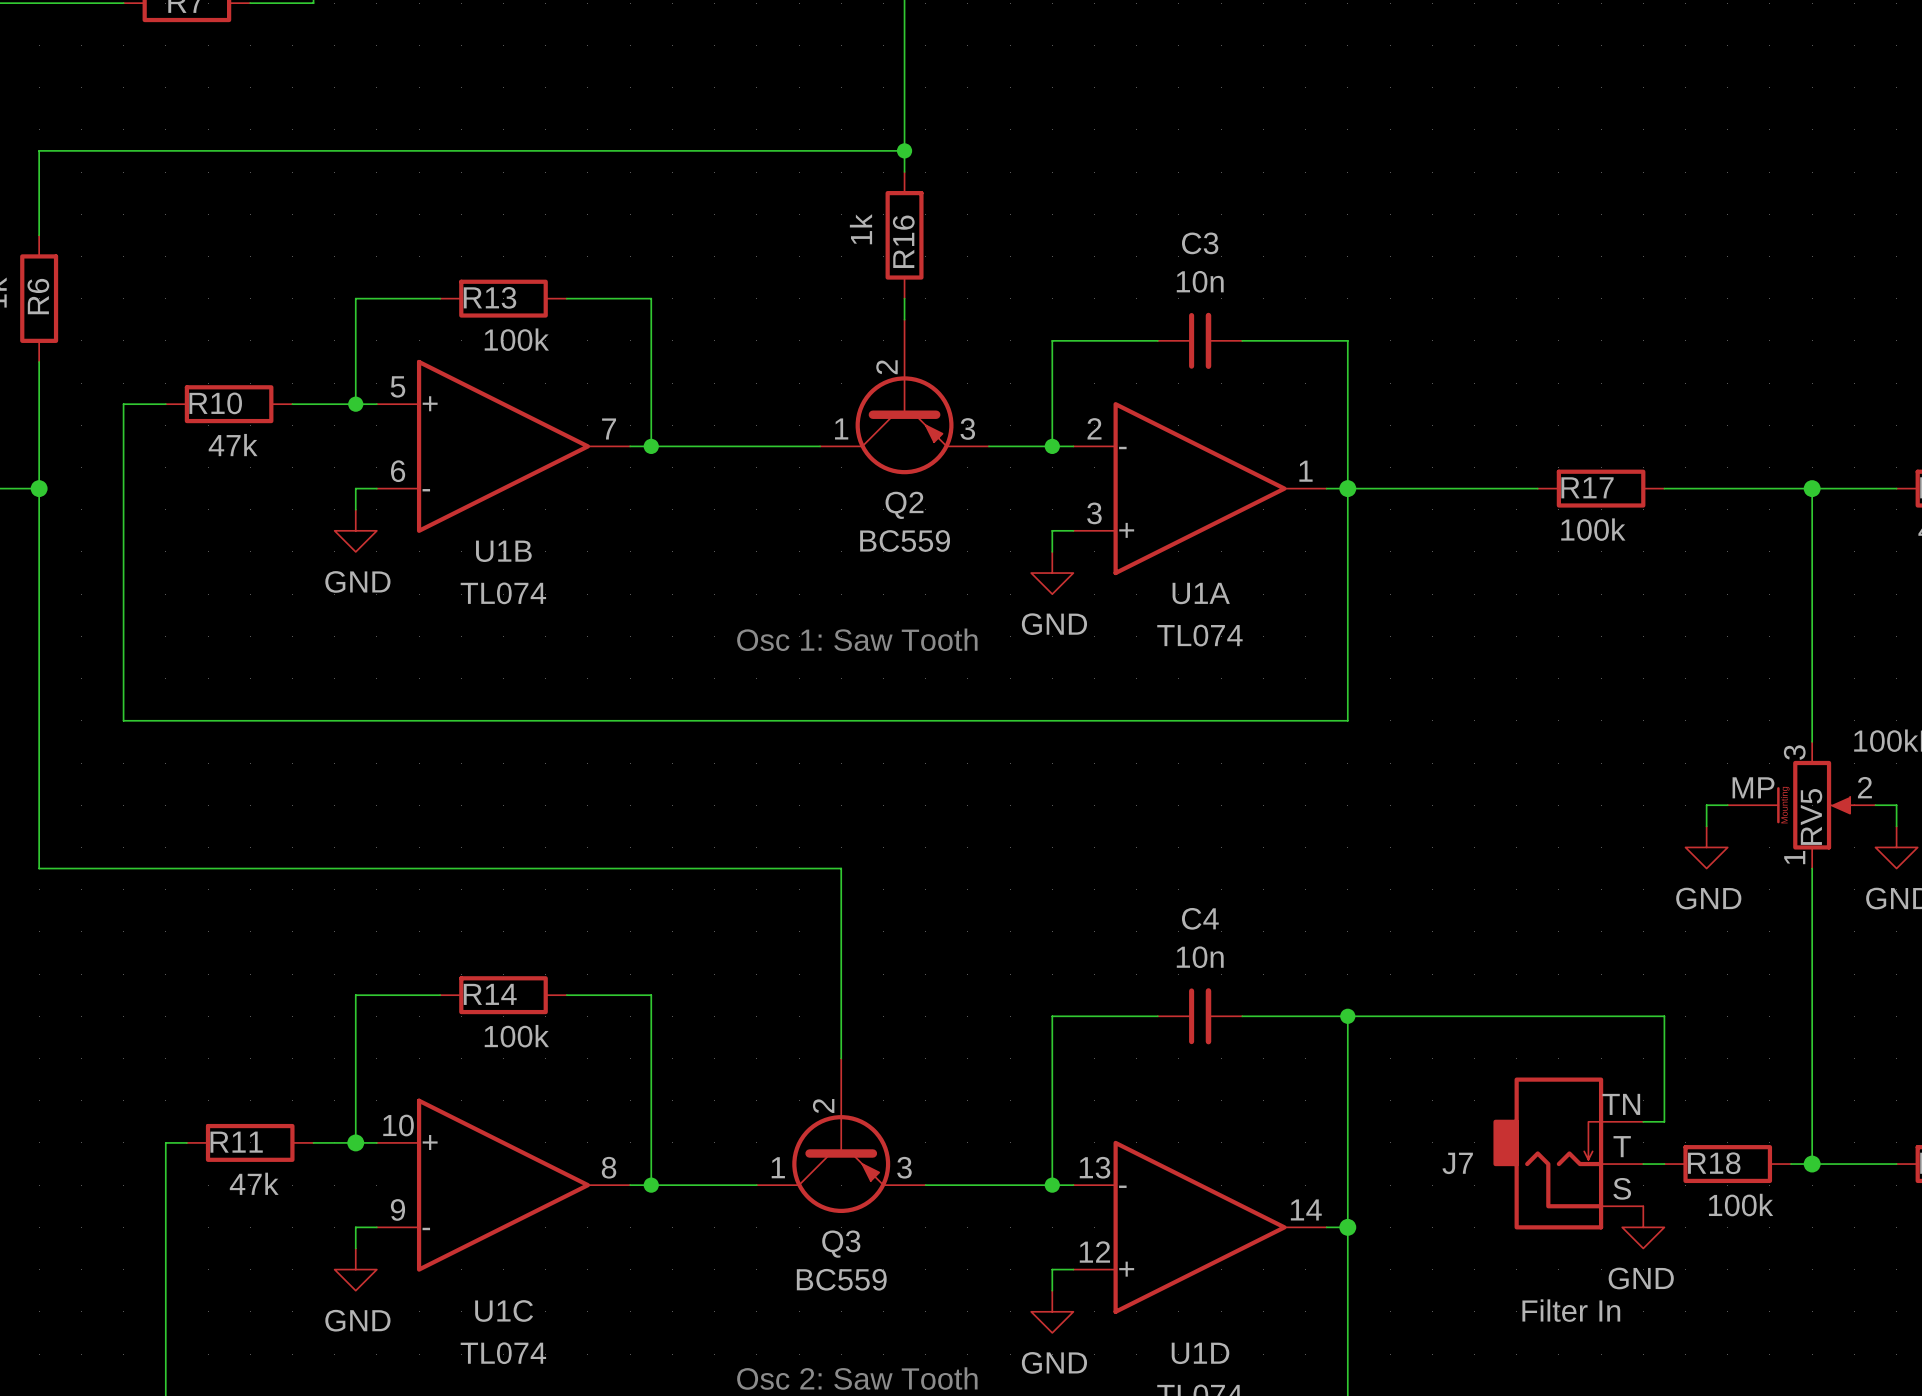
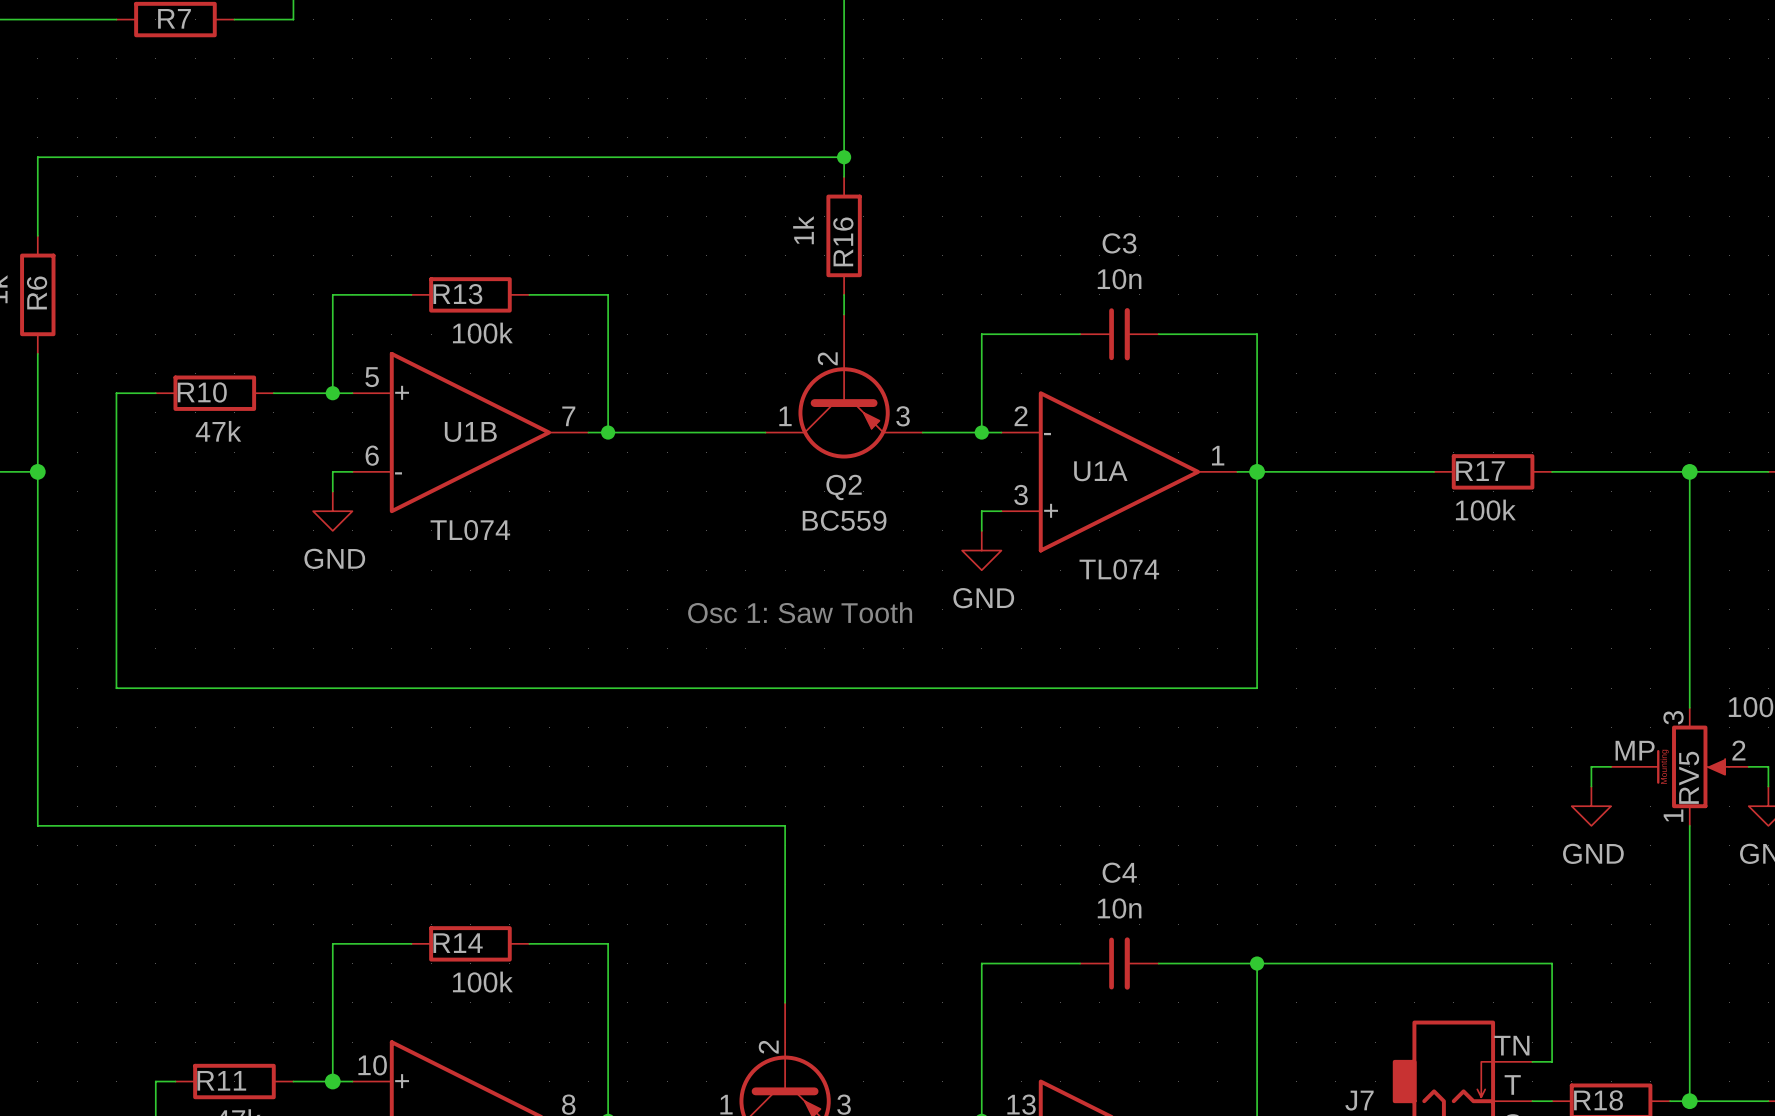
U1B name position: U1B (503, 551) -> U1B (470, 431)
U1B value position: TL074 (503, 593) -> TL074 (470, 530)
U1A name position: U1A (1201, 593) -> U1A (1100, 471)
U1A value position: TL074 (1199, 635) -> TL074 (1119, 569)

